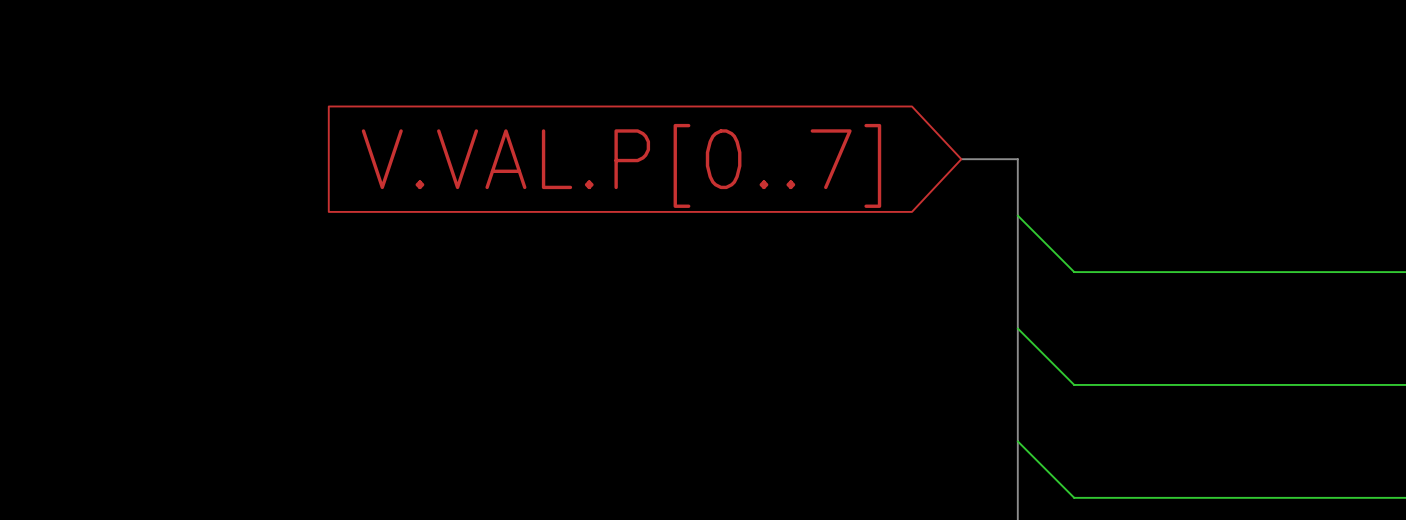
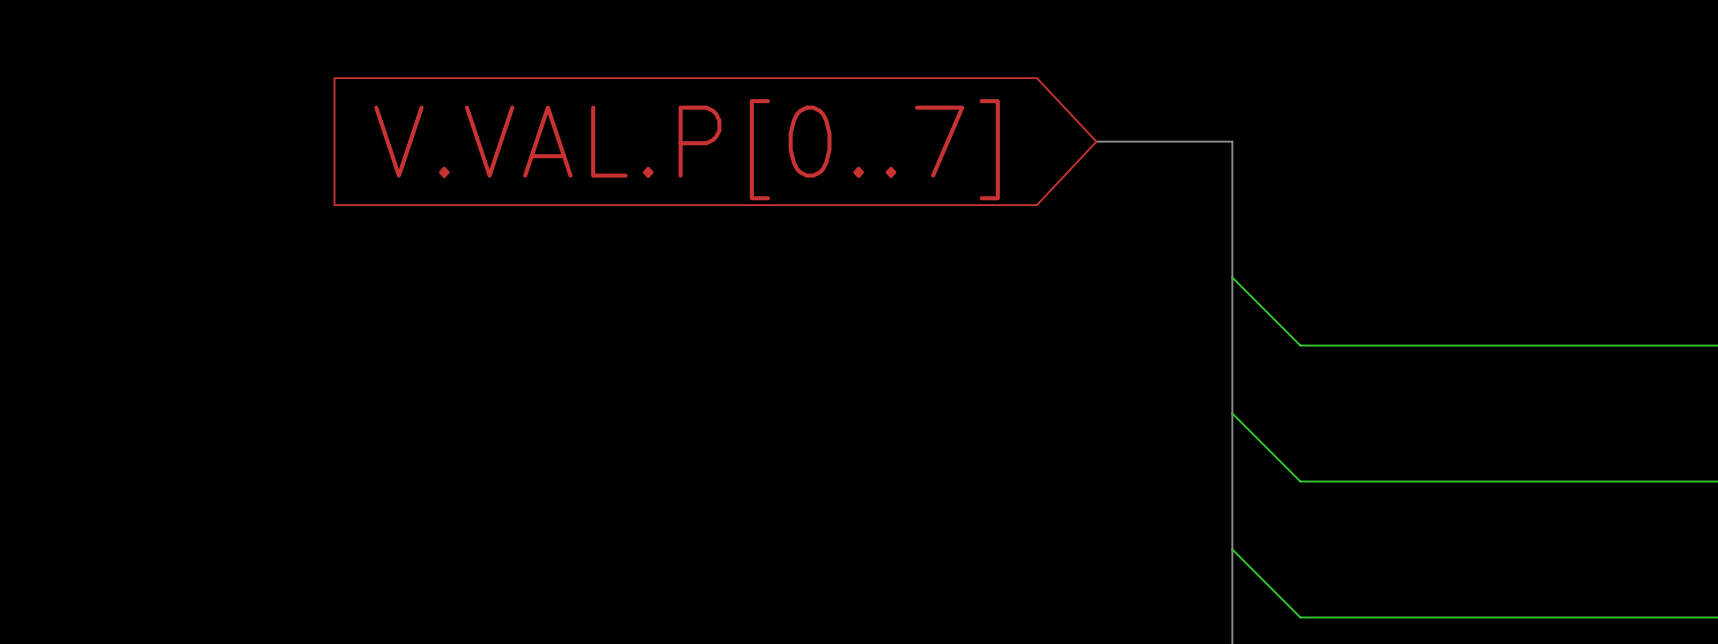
bus: (961, 159) (1017, 159) -> (1096, 141) (1232, 141) (1232, 209)
global label position: V.VAL.P[0..7] (621, 165) -> V.VAL.P[0..7] (687, 149)

